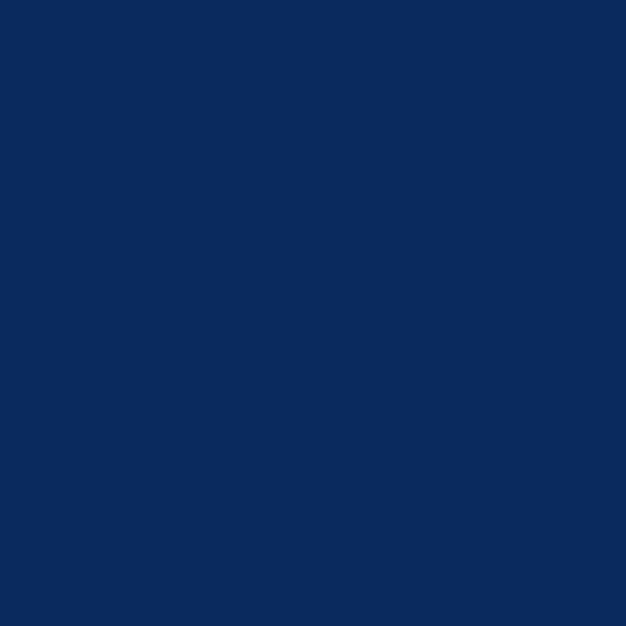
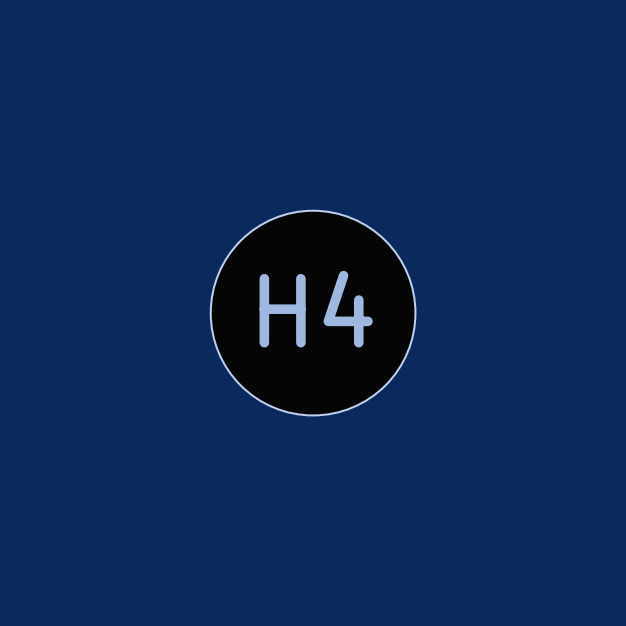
H4: none -> (313, 313)

